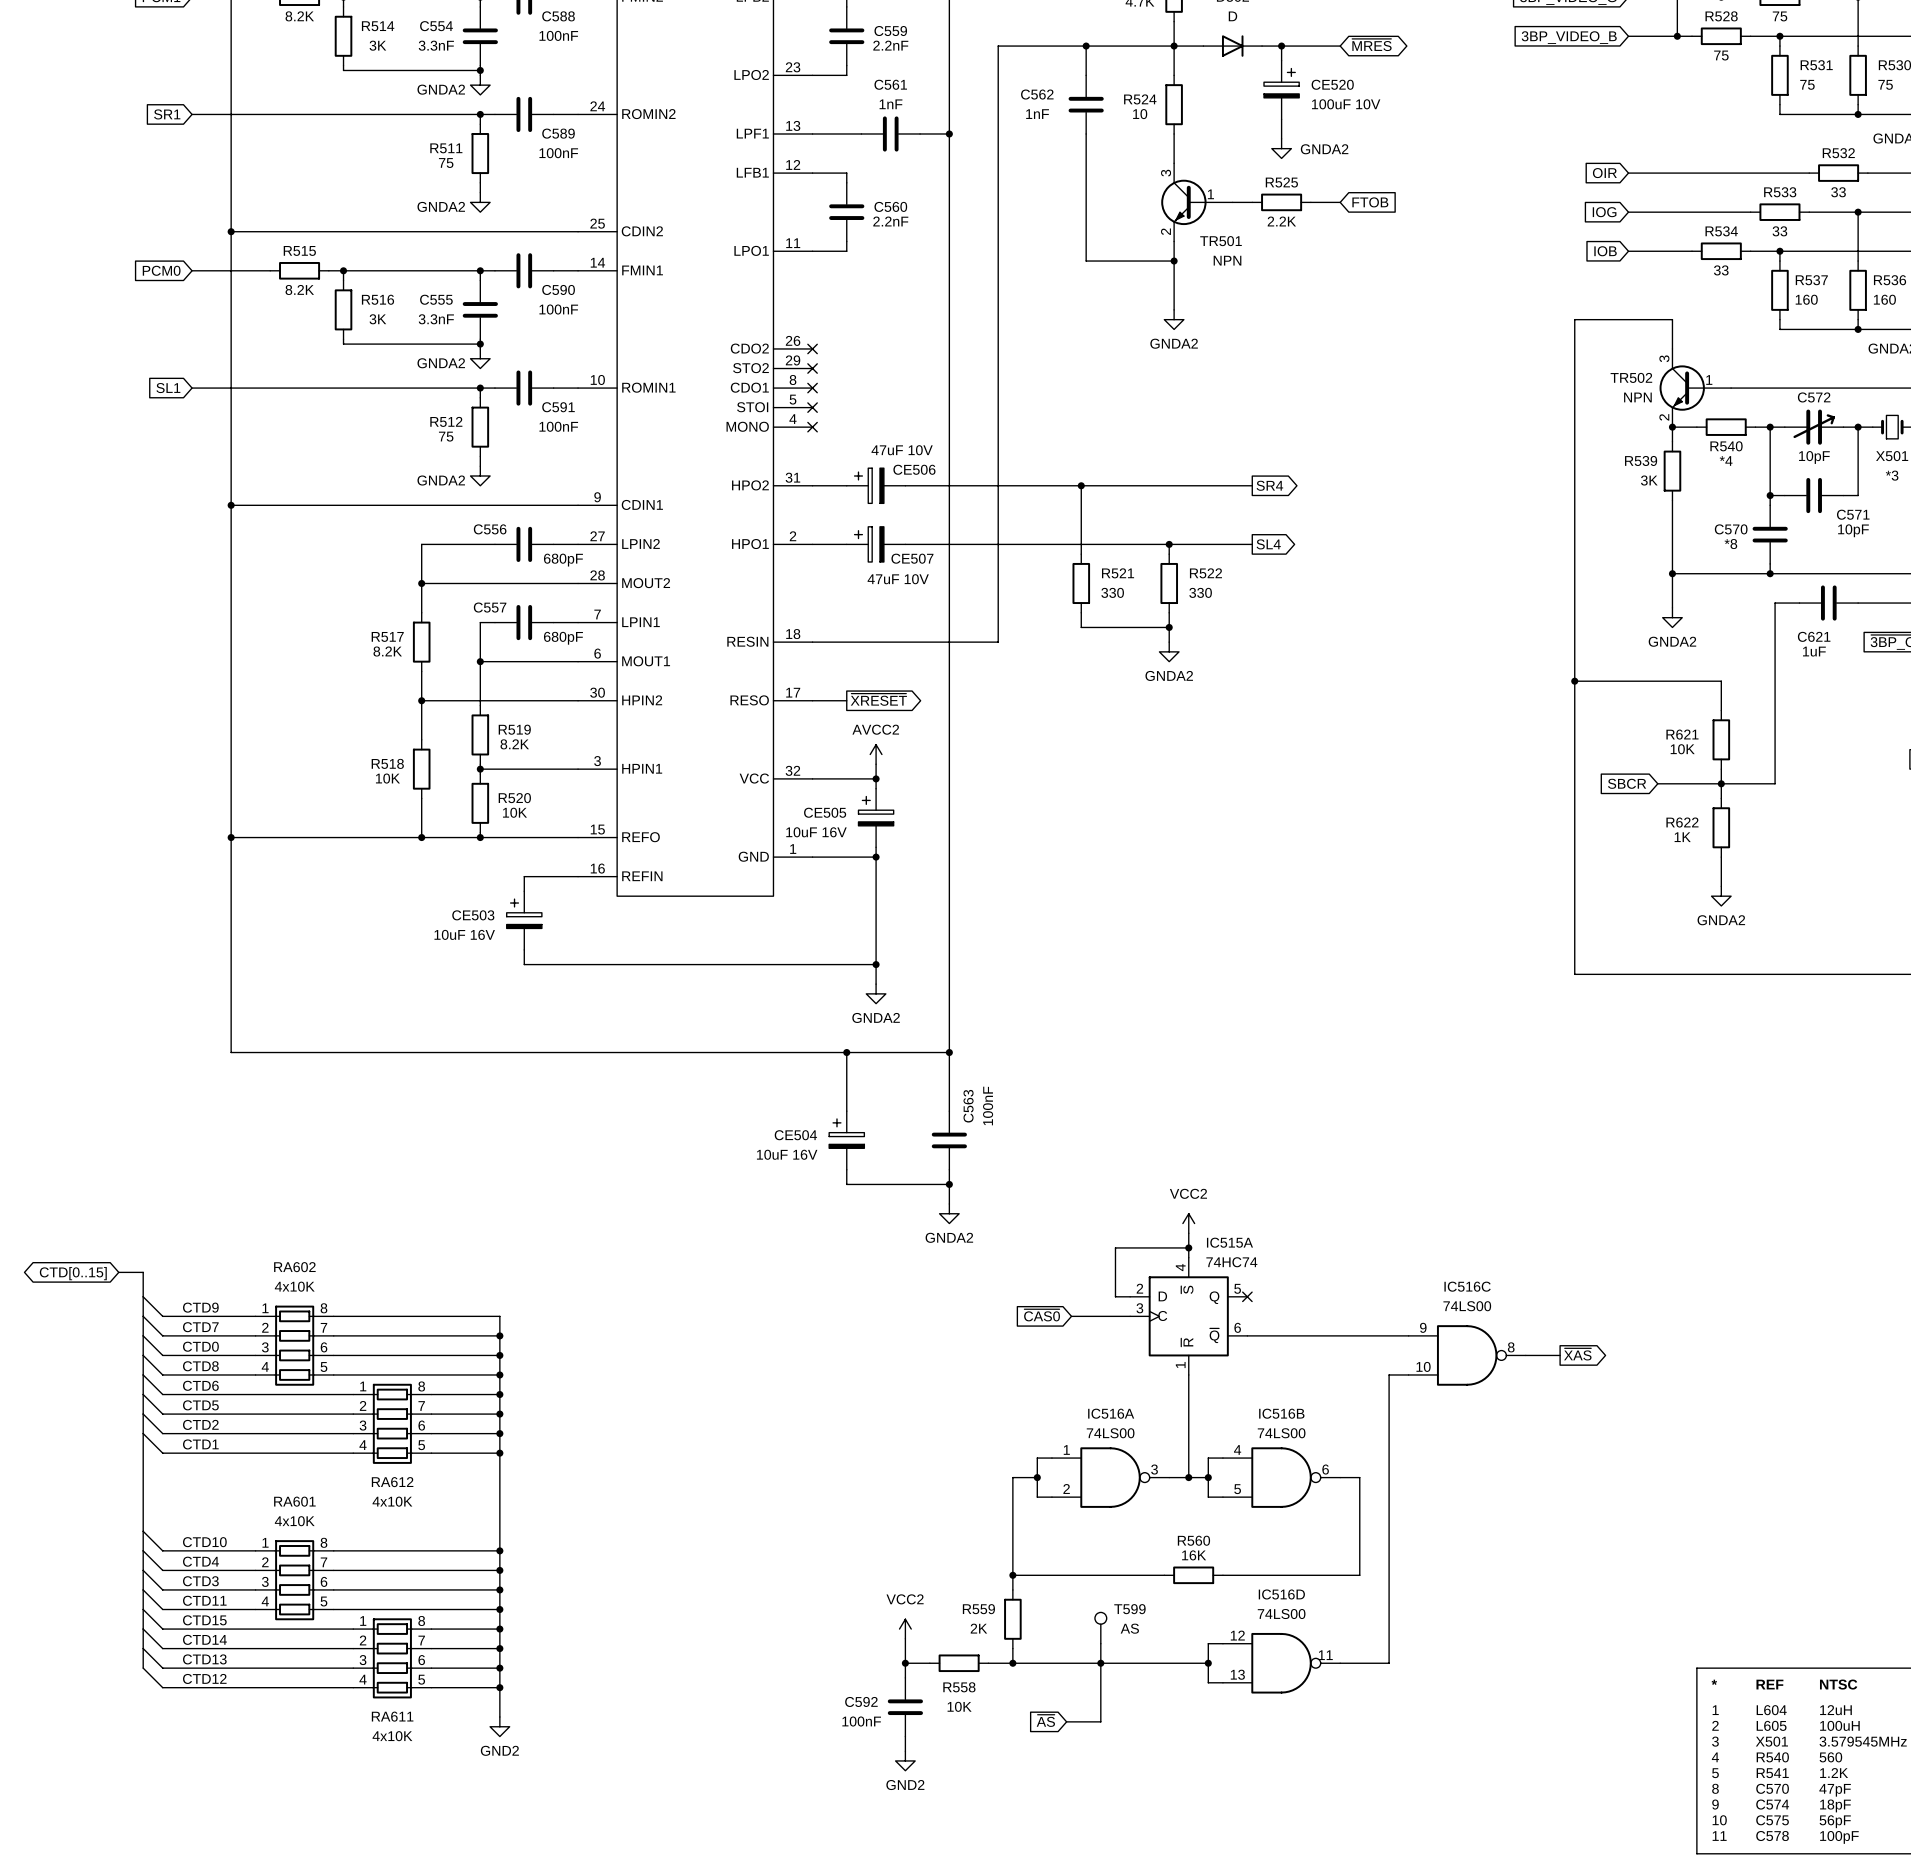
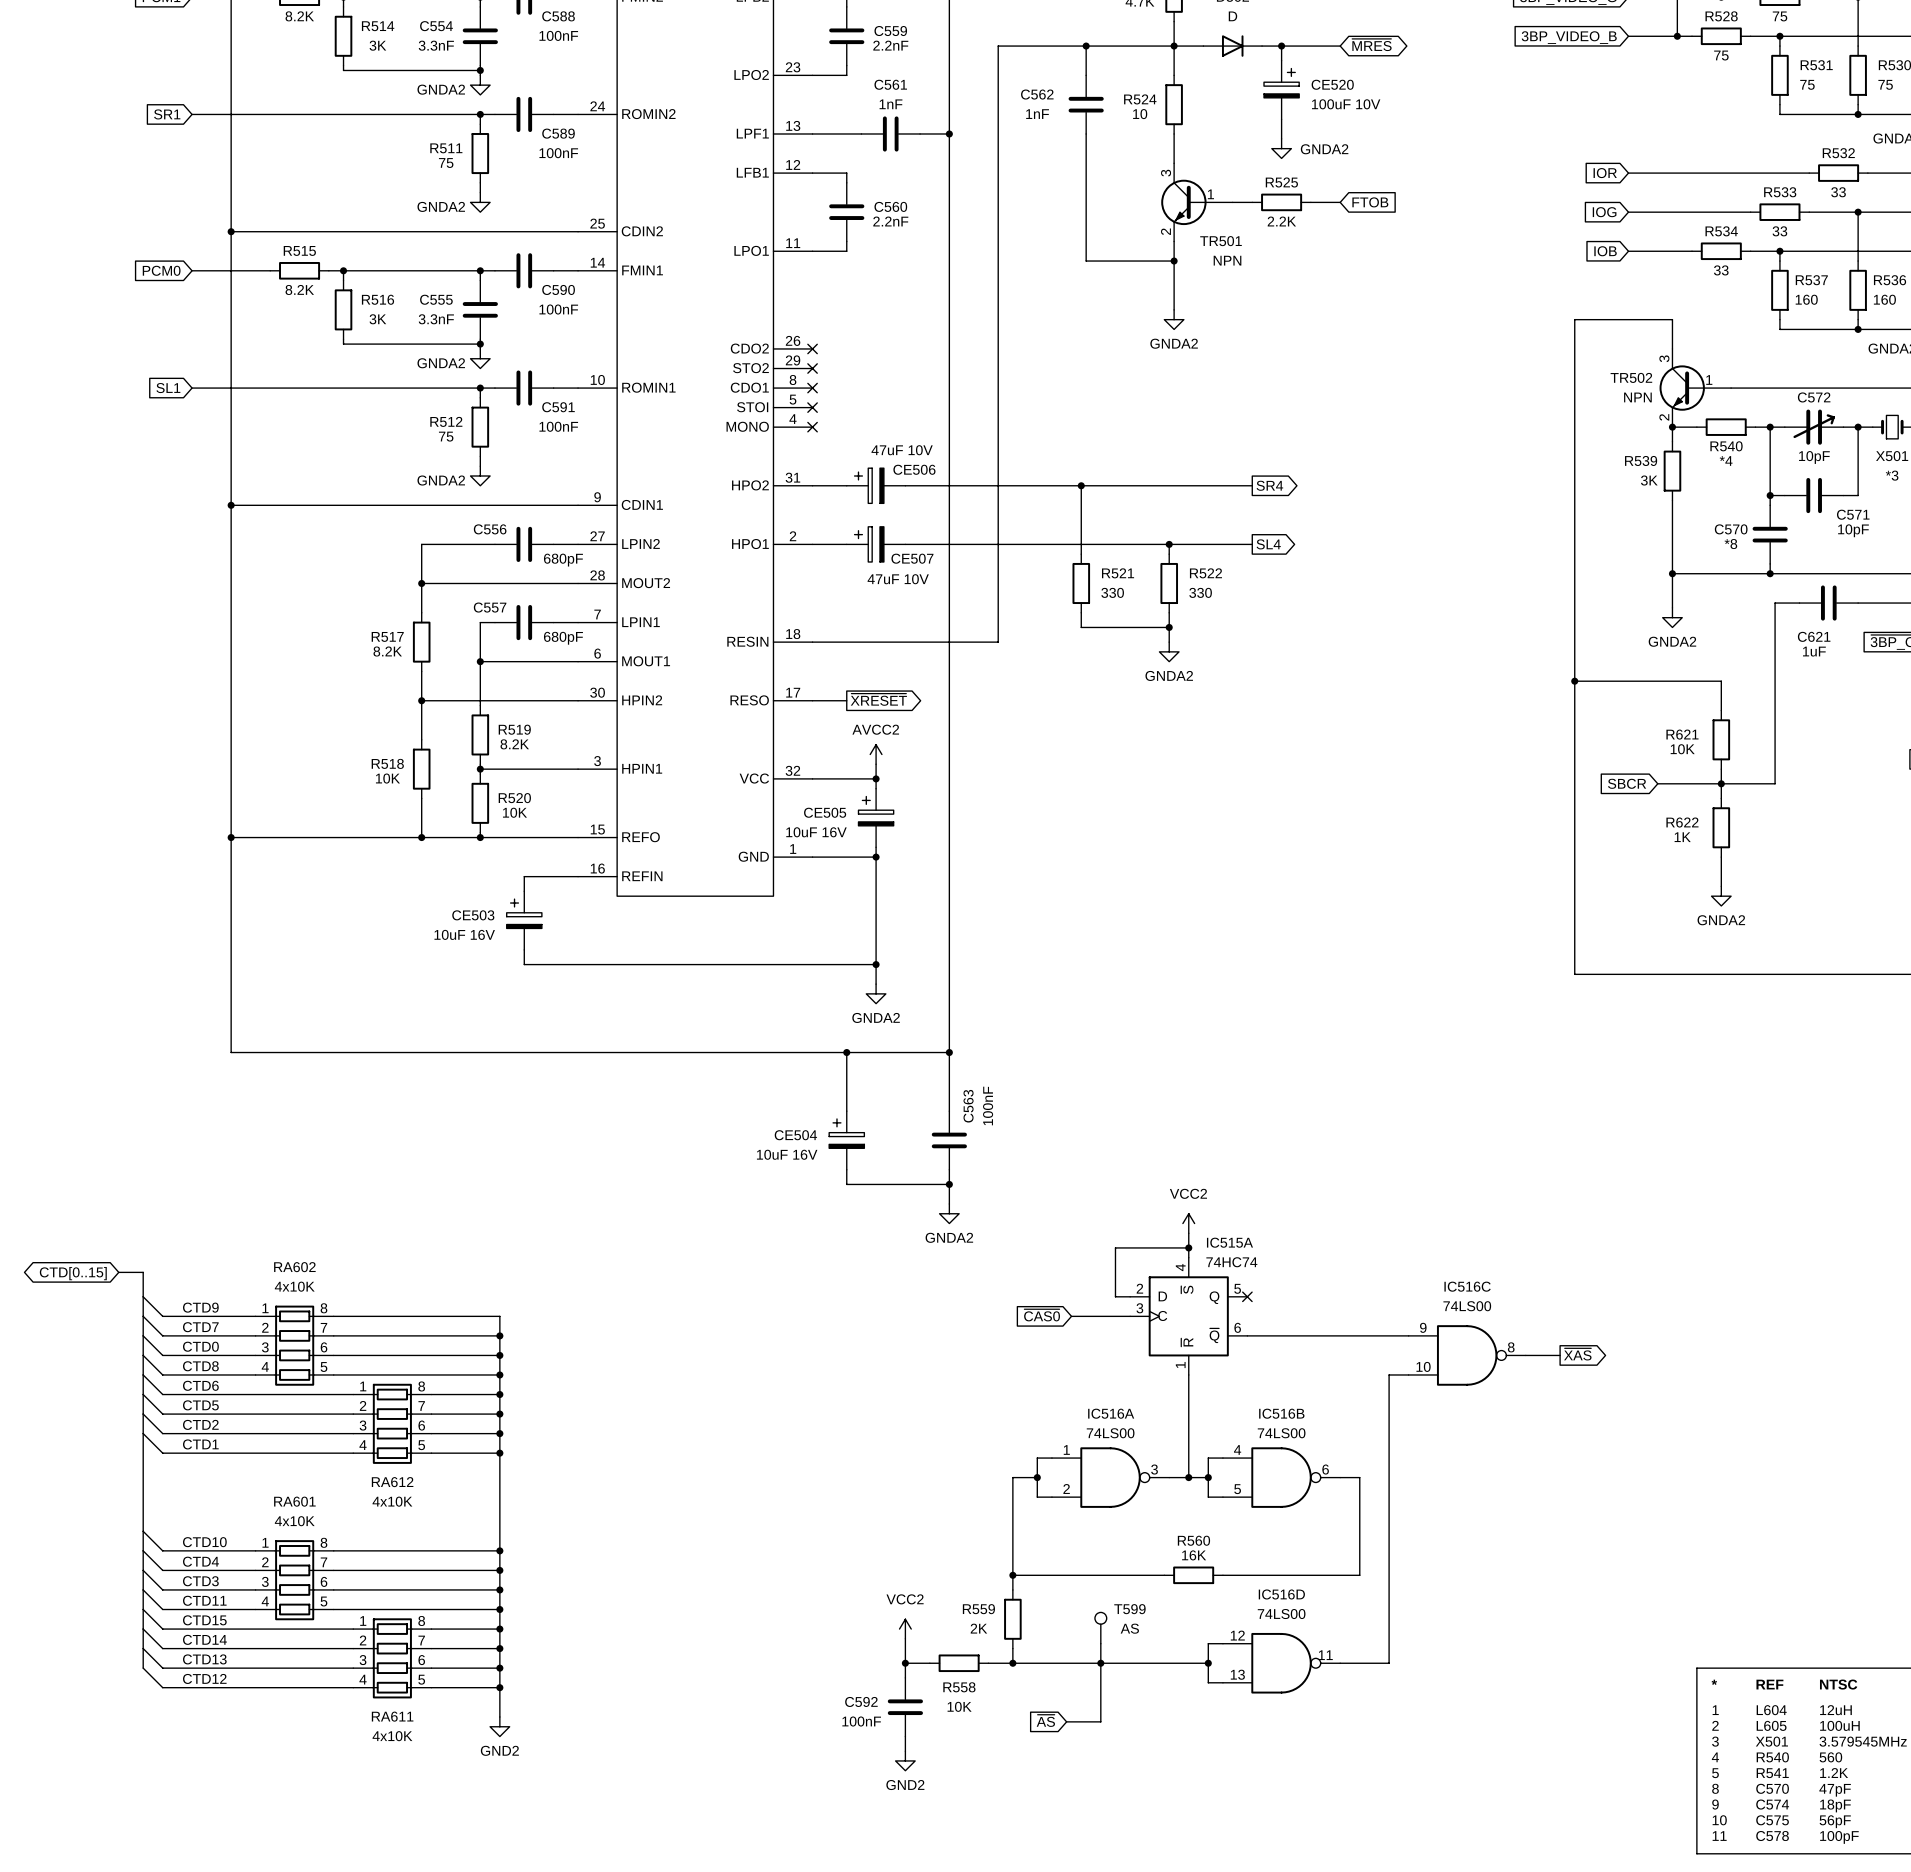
global label: OIR (1604, 173) -> IOR (1605, 173)

